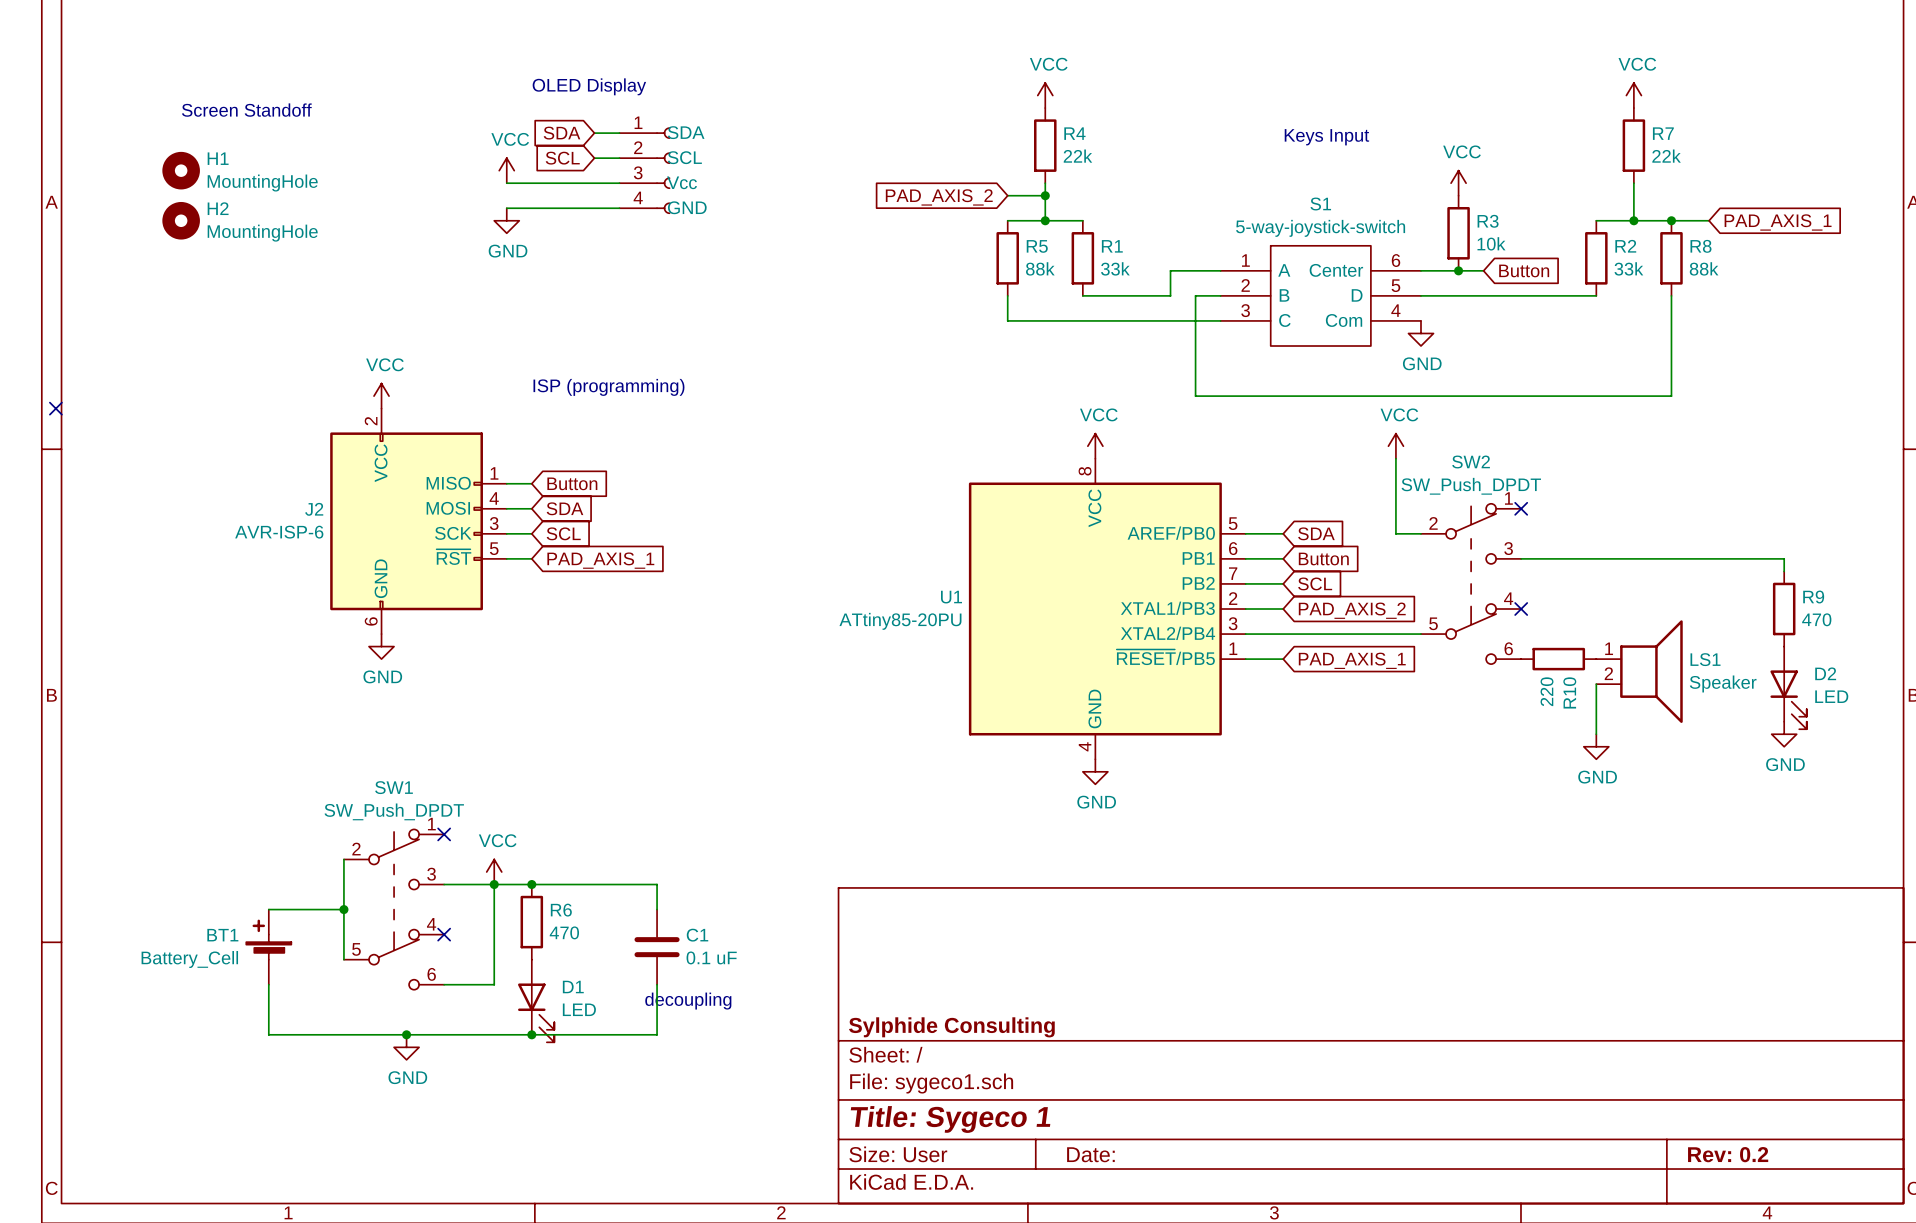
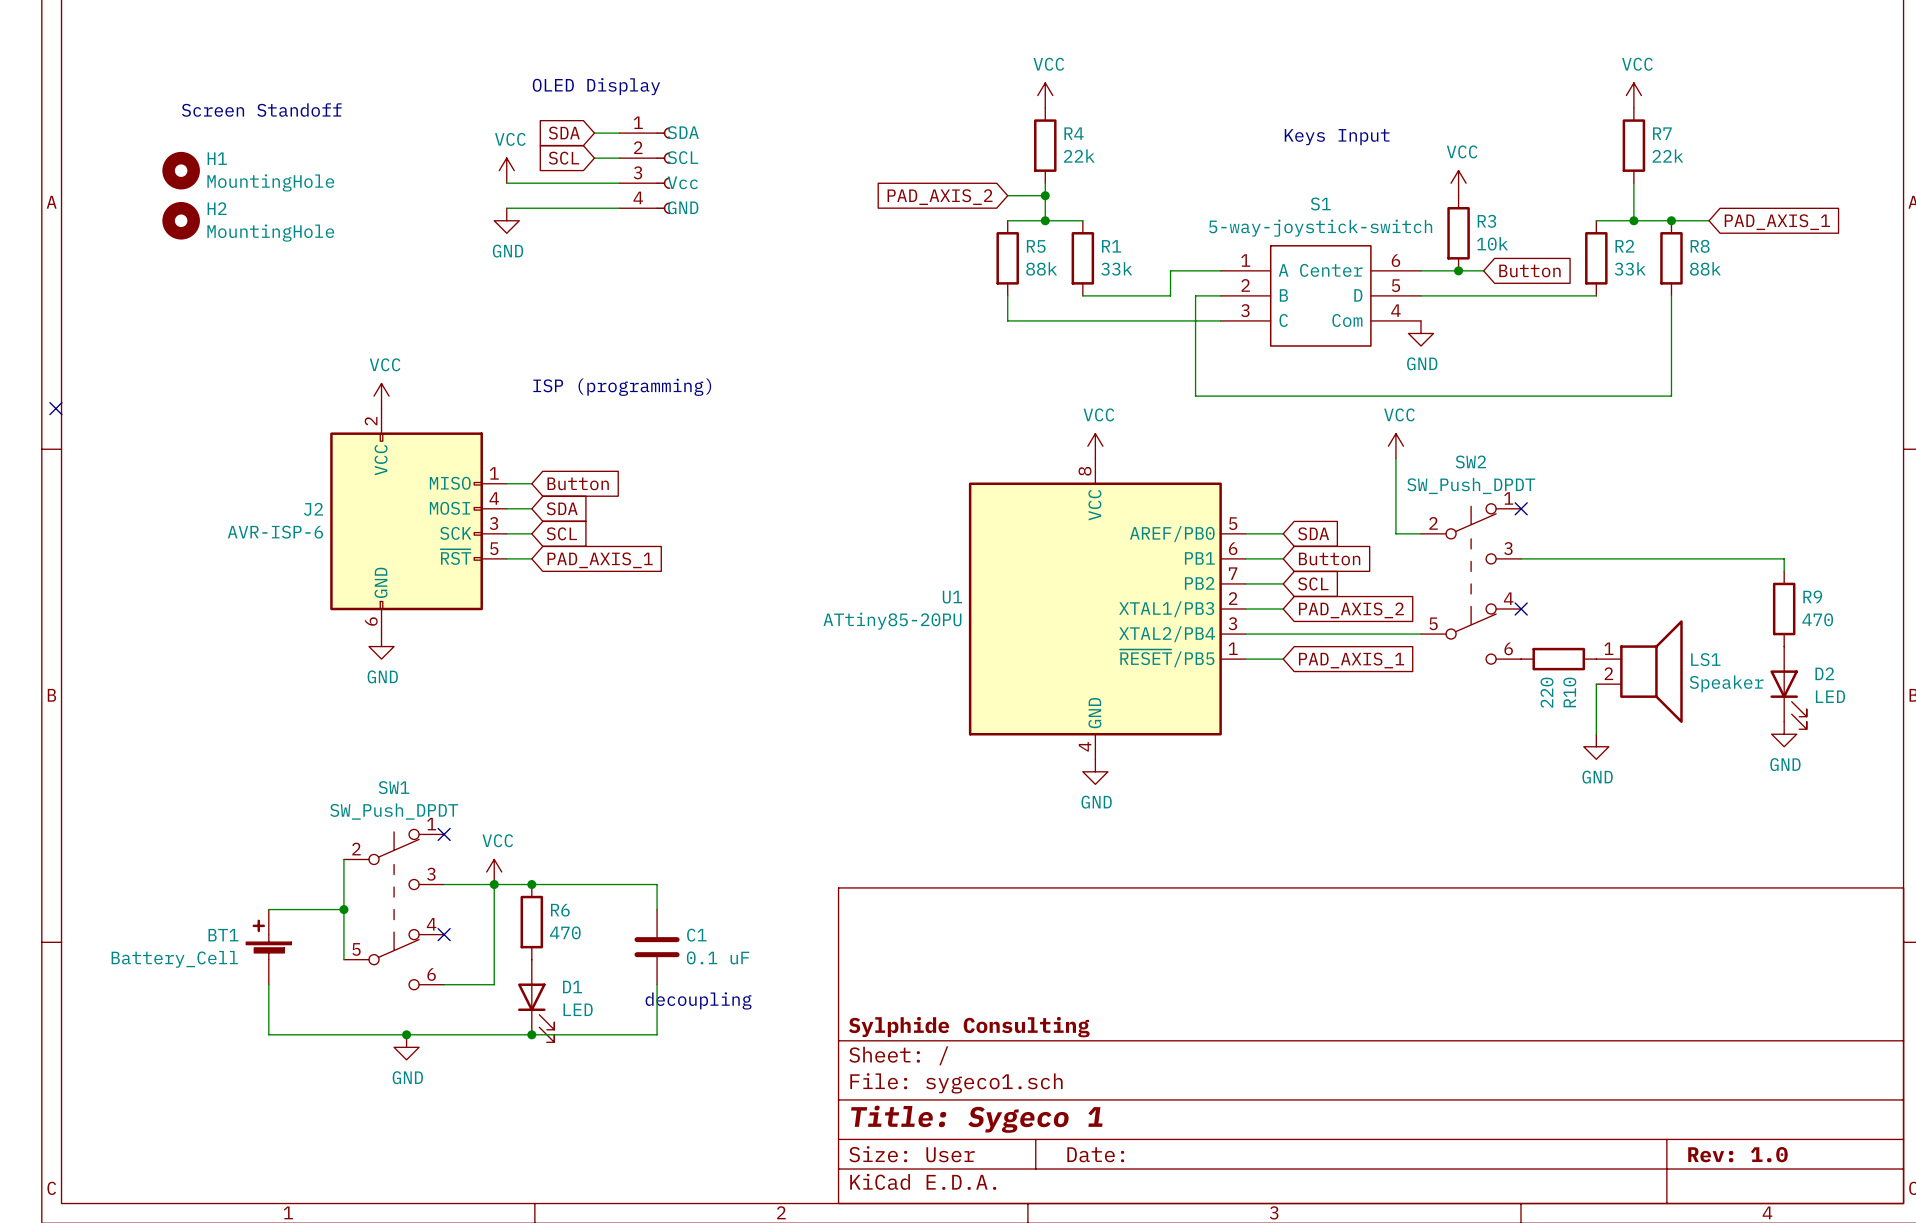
title block: Rev: 0.2 (1728, 1154) -> Rev: 1.0 (1737, 1154)

